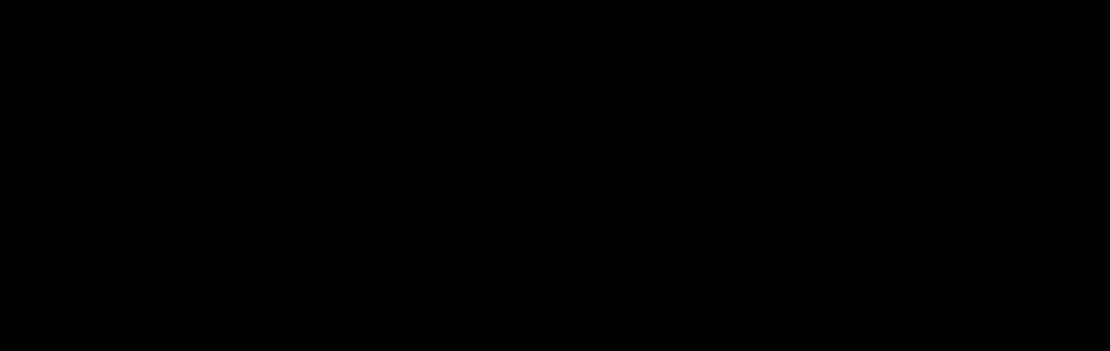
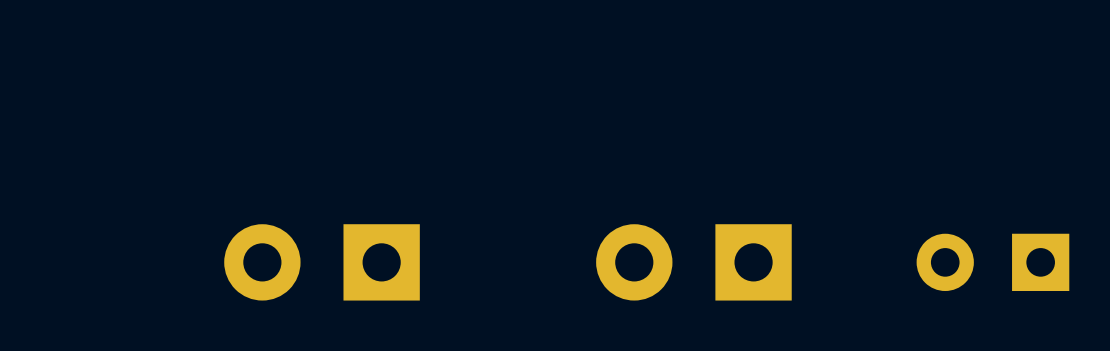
part: none -> (322, 262)
part: none -> (693, 262)
part: none -> (992, 262)

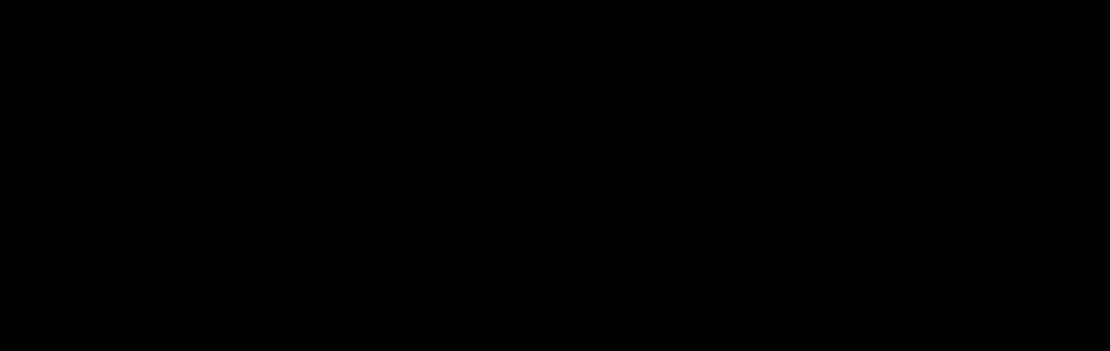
part: (322, 262) -> none
part: (693, 262) -> none
part: (992, 262) -> none

